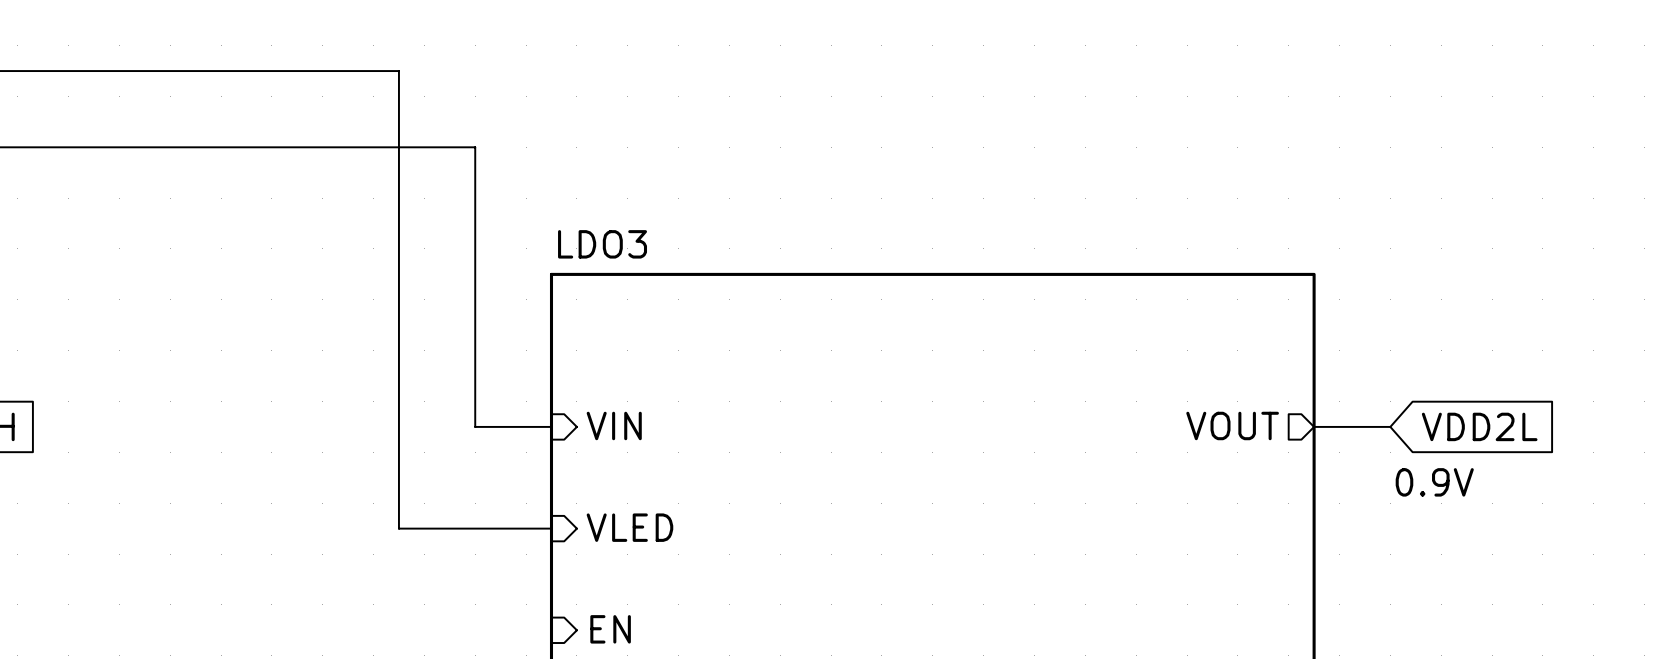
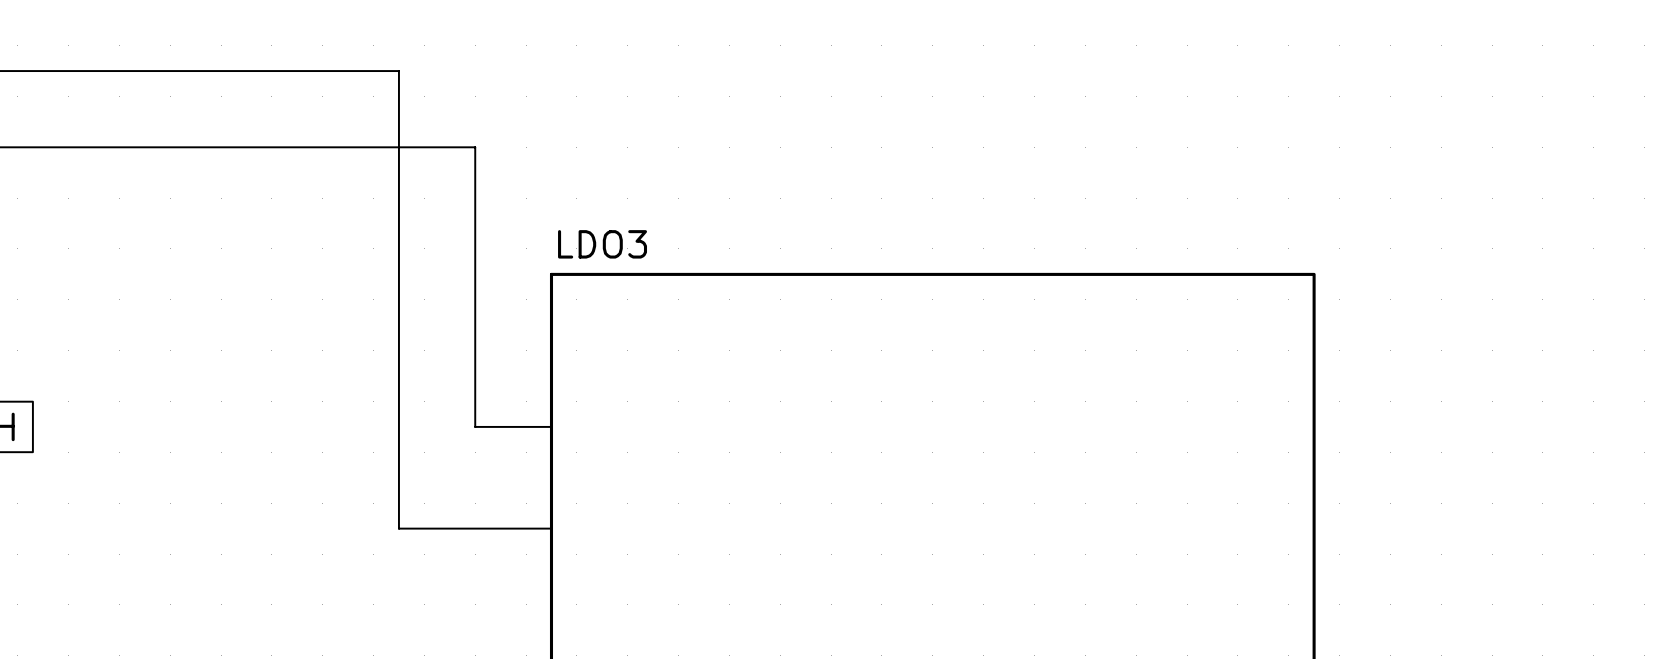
sheet pin: VIN (614, 425) -> none
sheet pin: VOUT (1232, 425) -> none
wire: (1314, 426) (1390, 426) -> none
global label: VDD2L (1479, 426) -> none
text: 0.9V (1434, 482) -> none
sheet pin: VLED (629, 527) -> none
sheet pin: EN (610, 629) -> none

